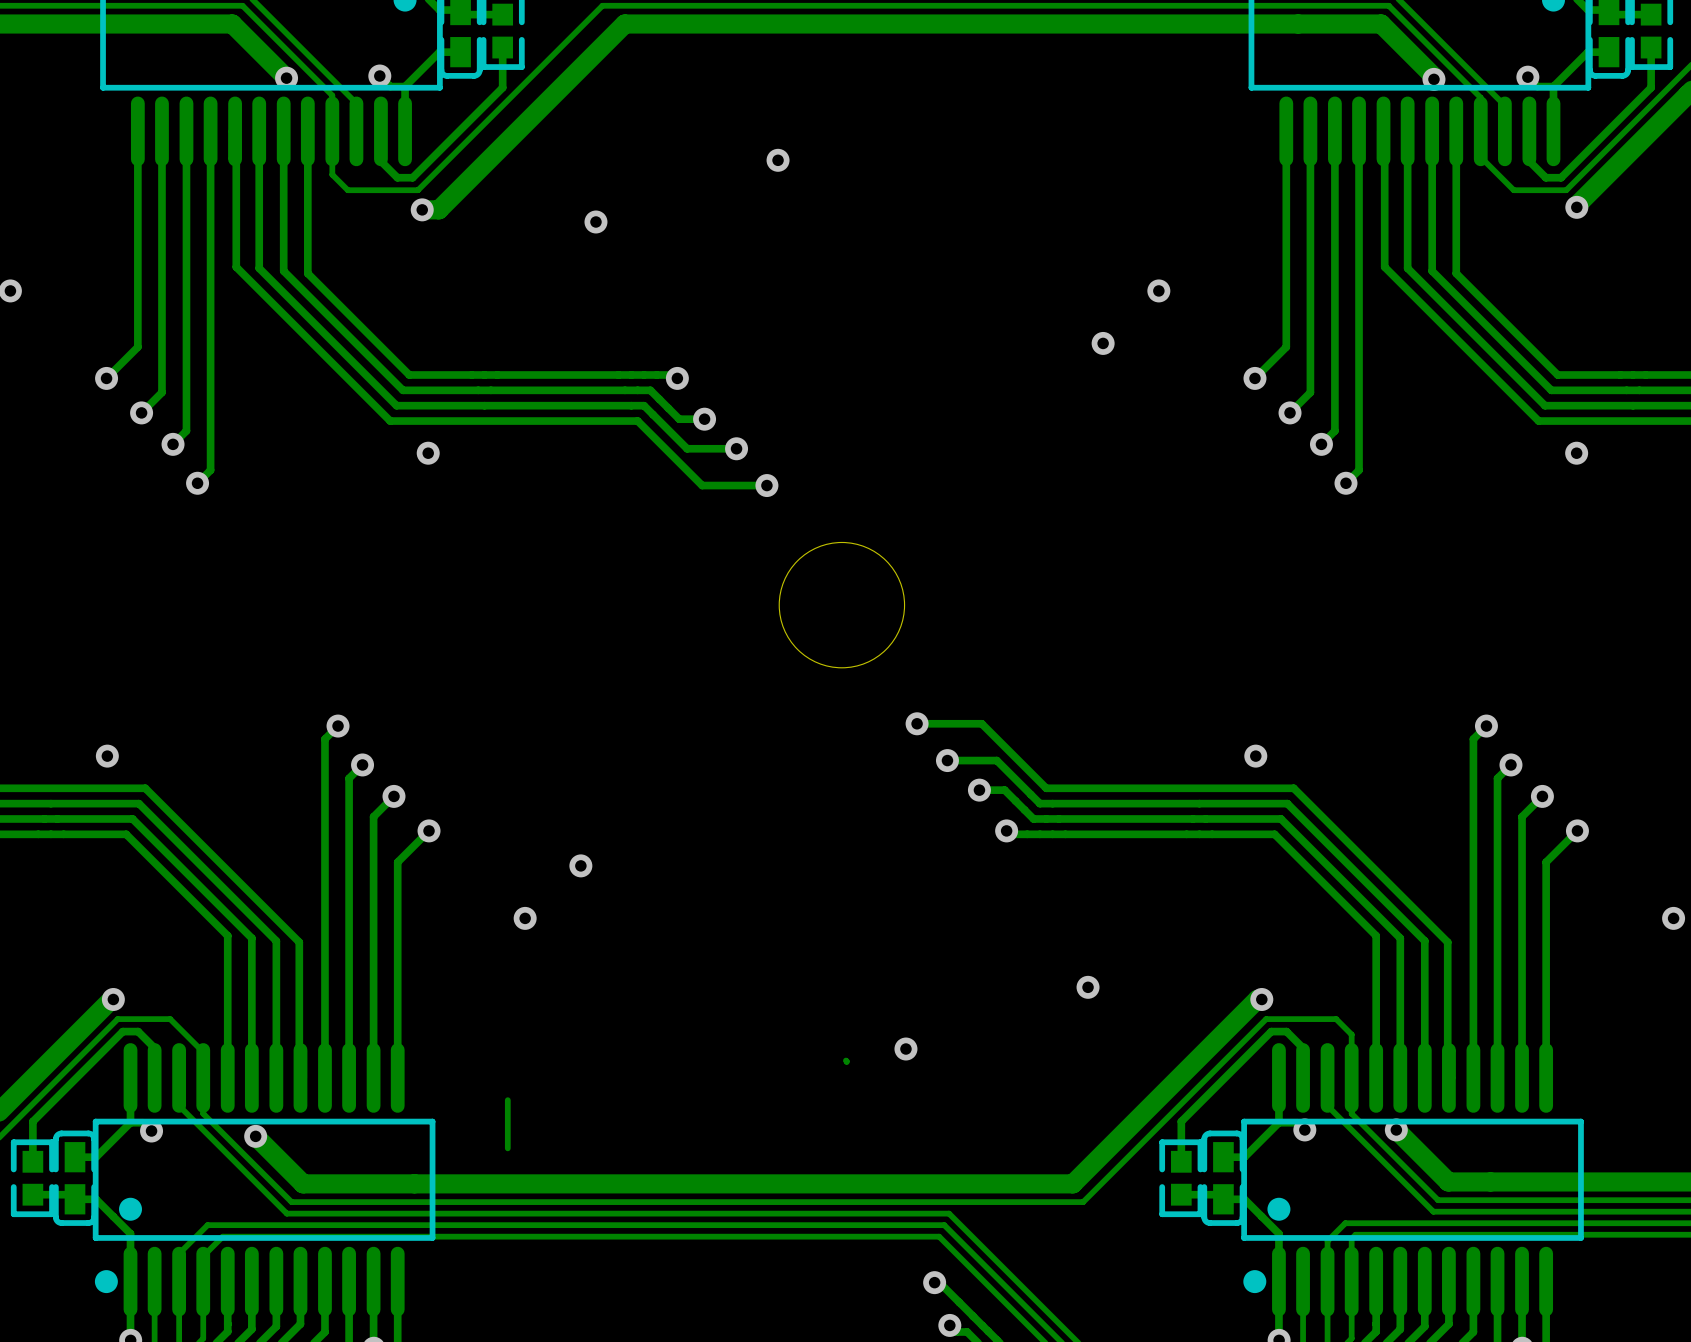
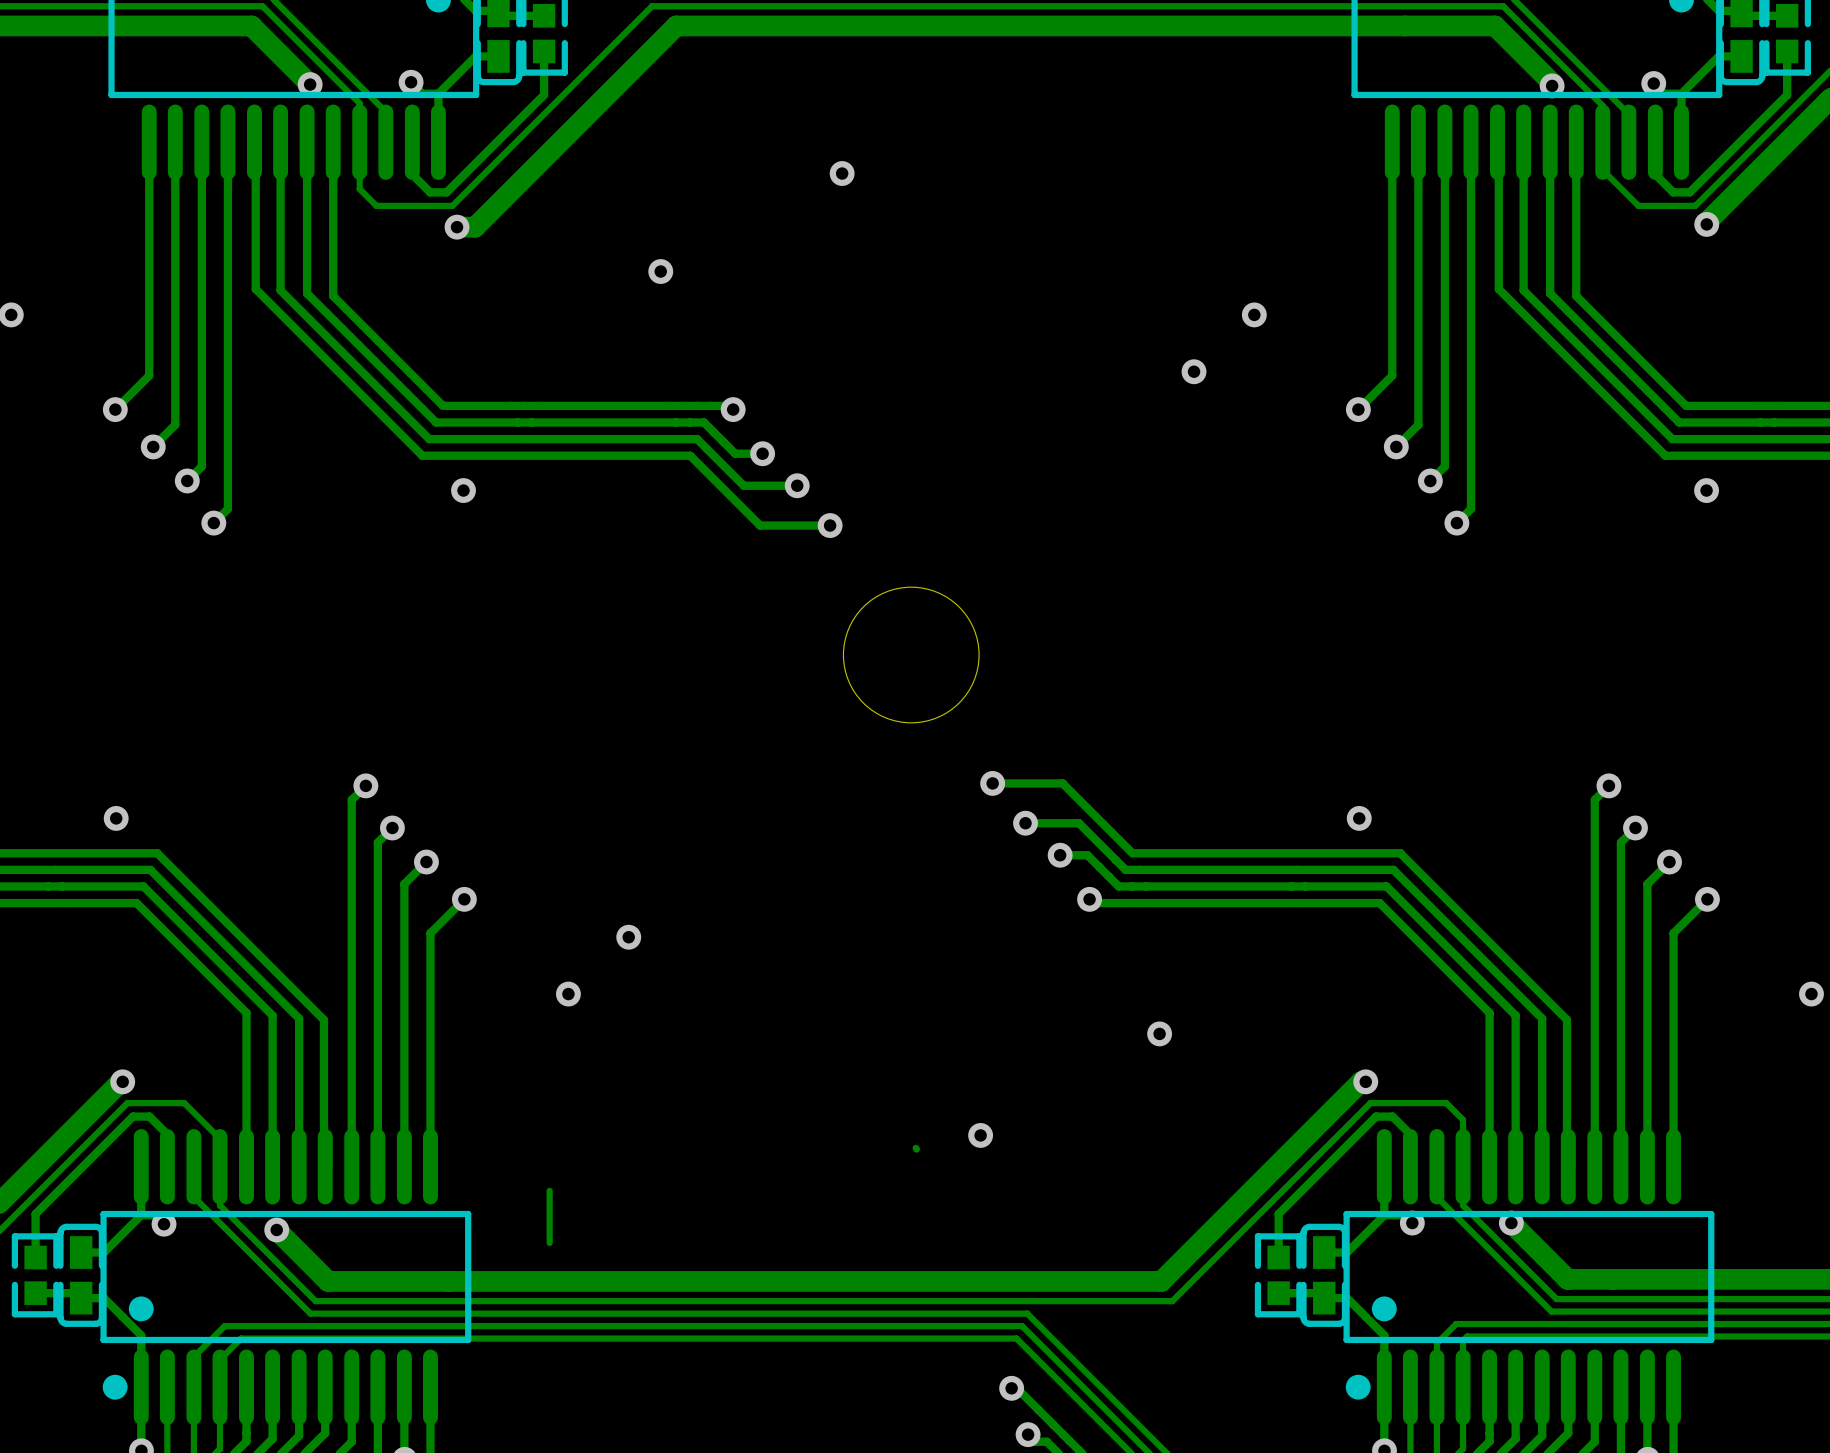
via position: (595, 221) -> (660, 271)
via position: (1088, 987) -> (1159, 1033)

